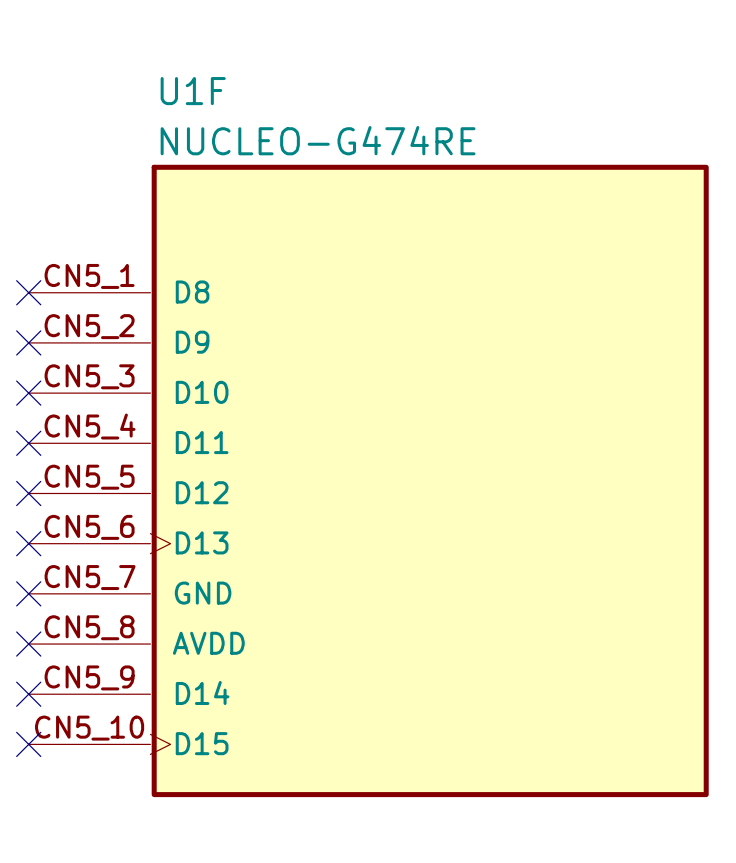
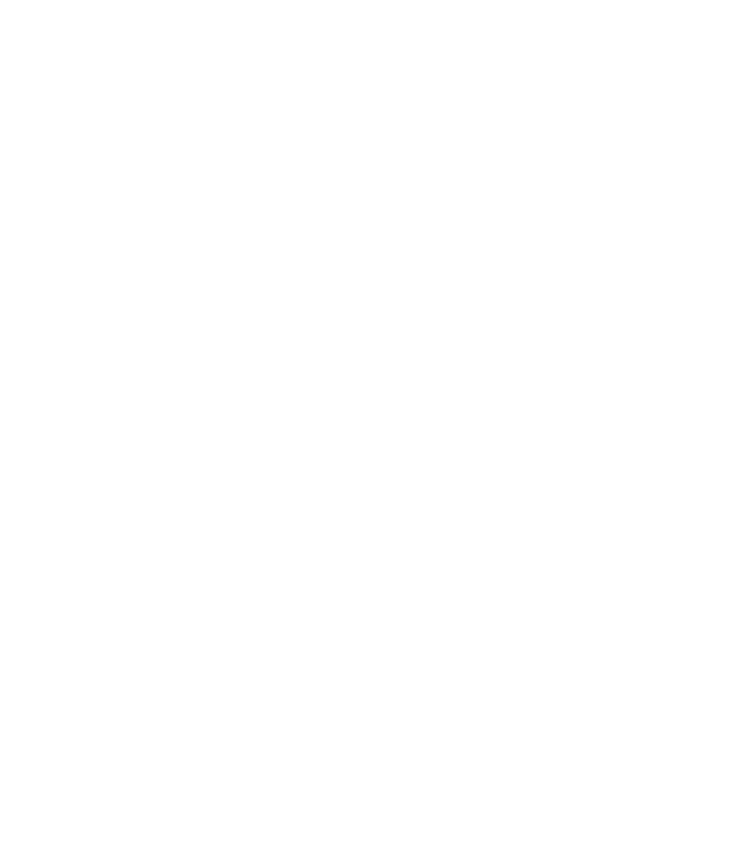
no-connect mark: (28, 292) -> none
no-connect mark: (28, 342) -> none
no-connect mark: (28, 393) -> none
no-connect mark: (28, 443) -> none
U1F: NUCLEO-G474RE (368, 480) -> none
no-connect mark: (28, 493) -> none
no-connect mark: (28, 543) -> none
no-connect mark: (28, 593) -> none
no-connect mark: (28, 644) -> none
no-connect mark: (28, 694) -> none
no-connect mark: (28, 744) -> none

